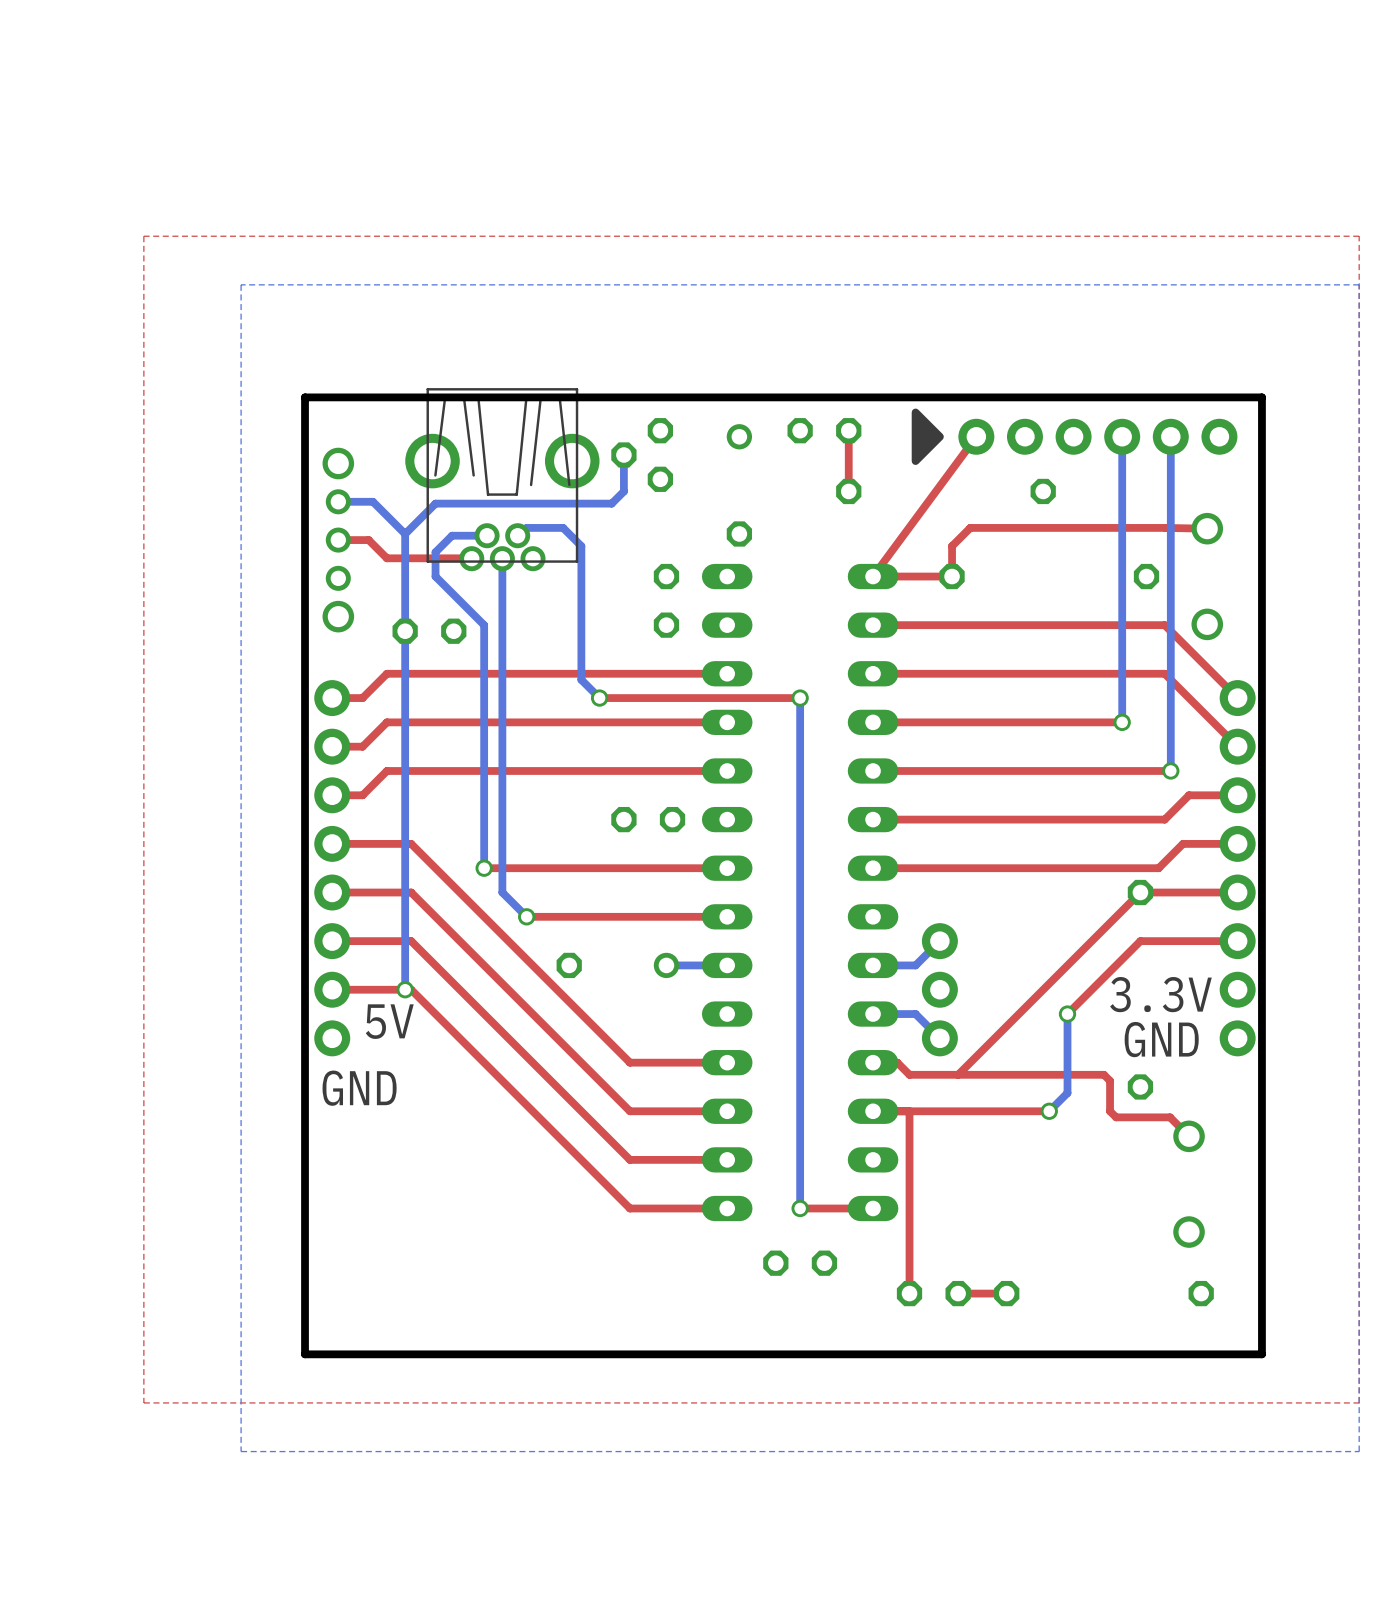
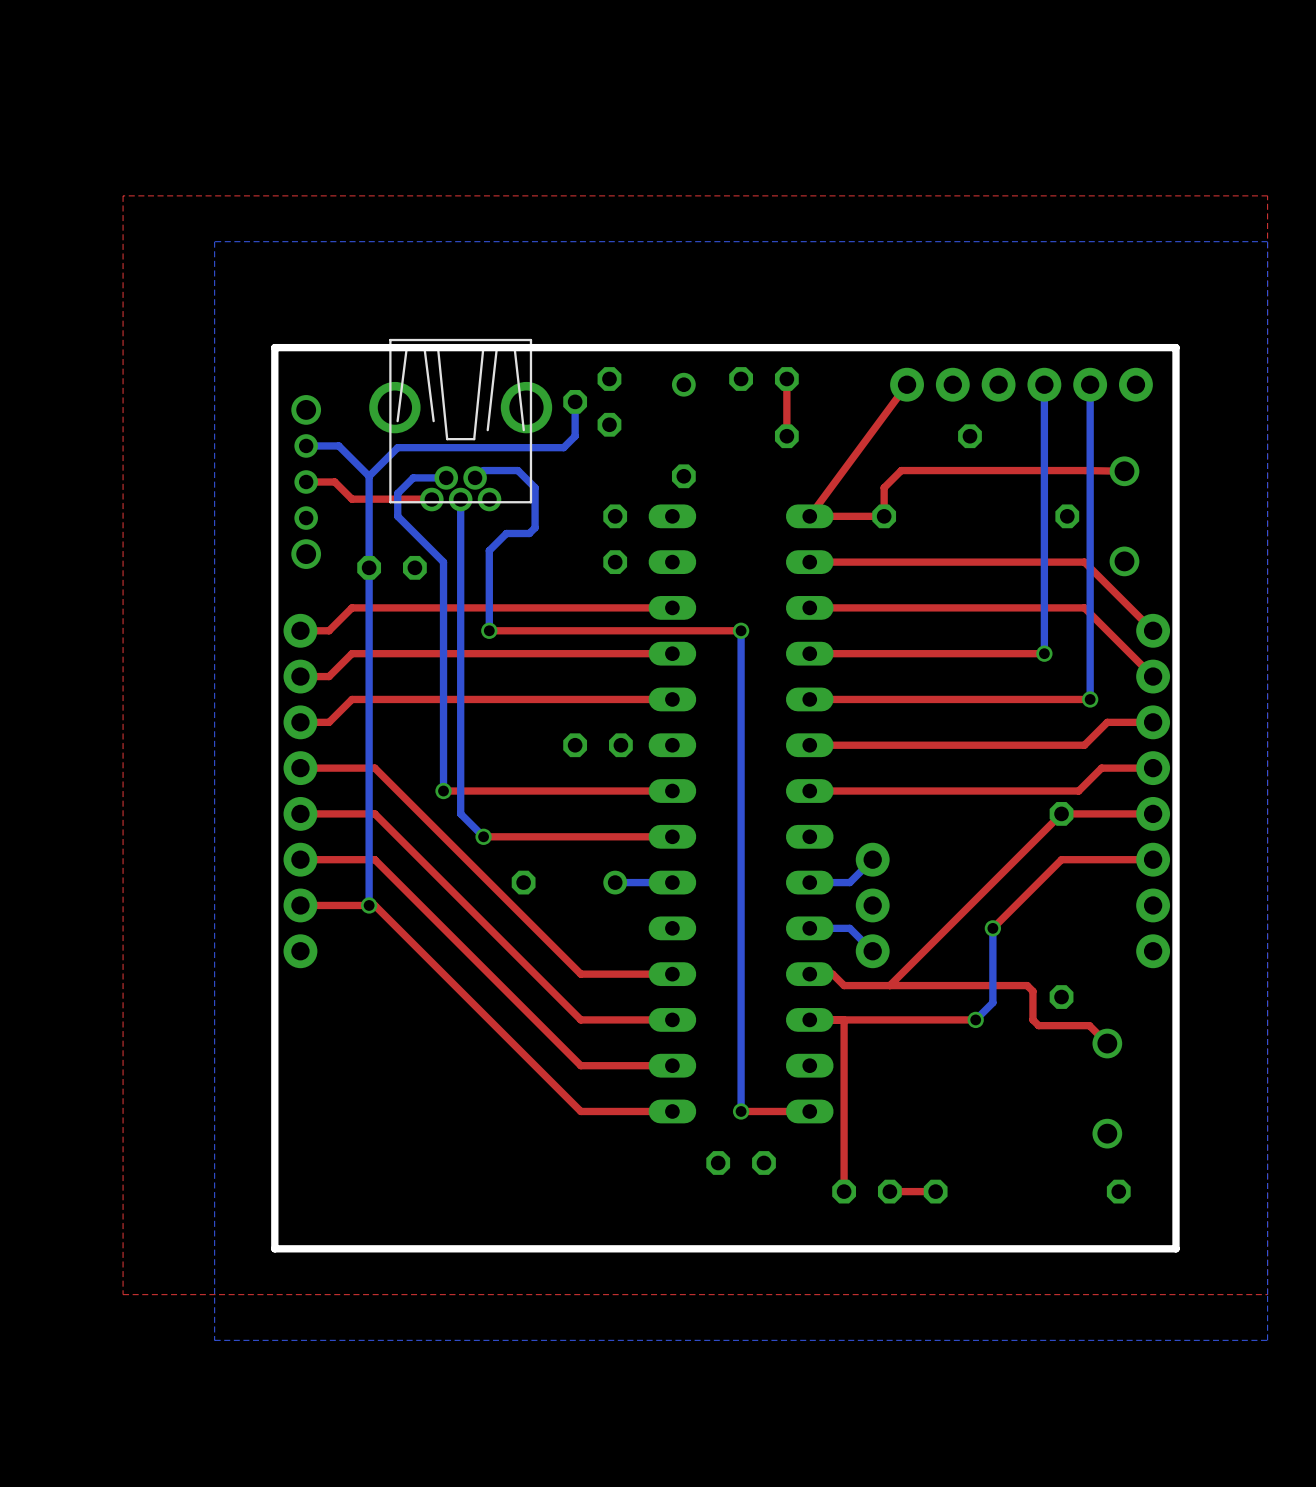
drawing: [911, 408, 944, 465] -> none
bottom track: (581, 588) (581, 679) (599, 698) -> (535, 527) (529, 533) (506, 533) (489, 550) (489, 630)
top track: none -> (552, 630) (489, 630)
via position: (599, 698) -> (489, 630)
text: 3.3V (1160, 994) -> none
text: 5V (389, 1021) -> none
text: GND (1161, 1039) -> none
text: GND (359, 1088) -> none

